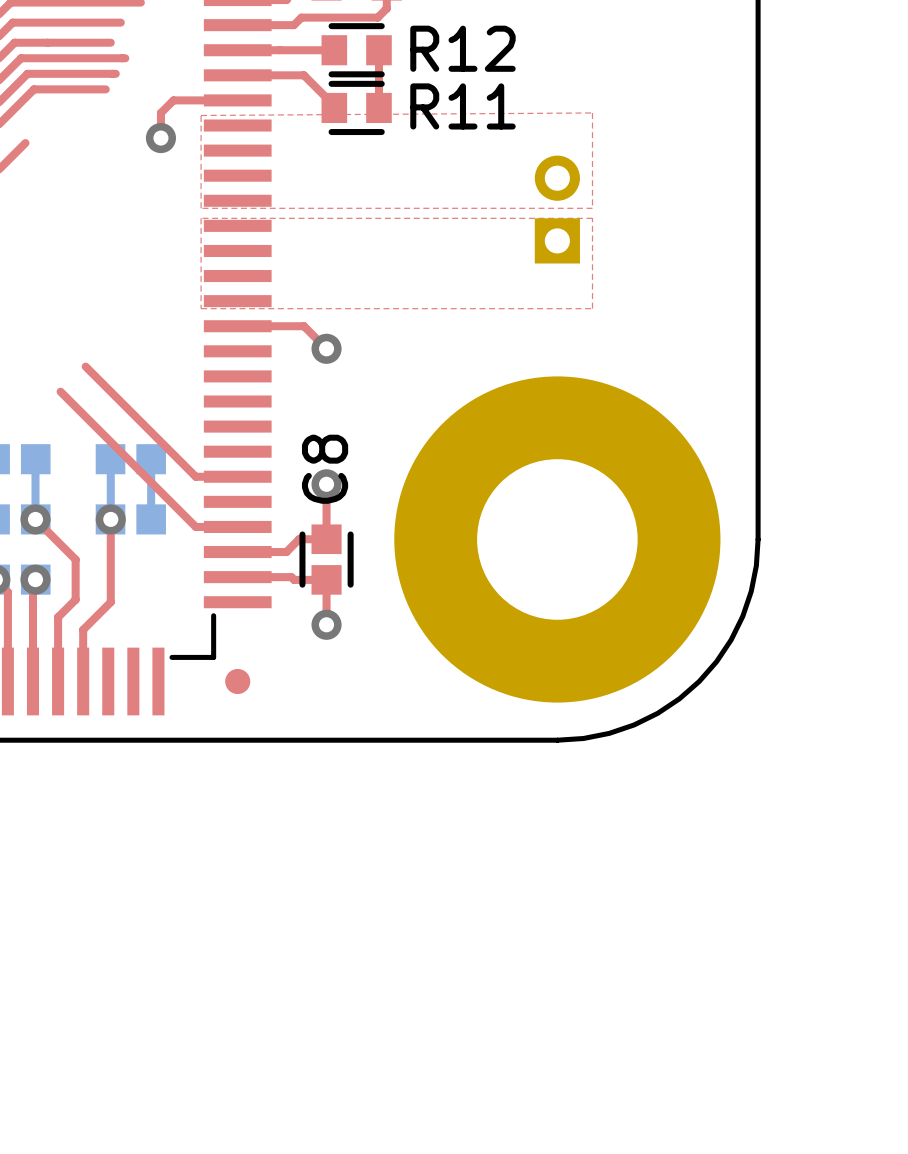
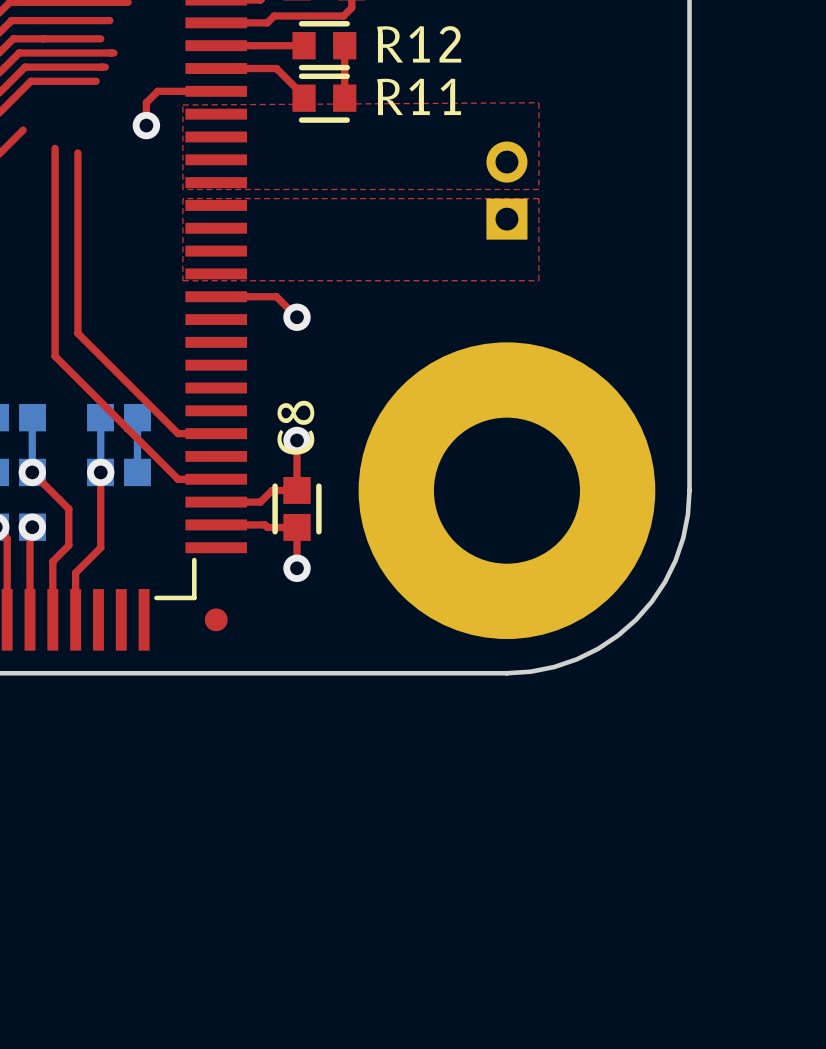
top track: none -> (55, 148) (55, 356)
top track: none -> (77, 152) (77, 333)

